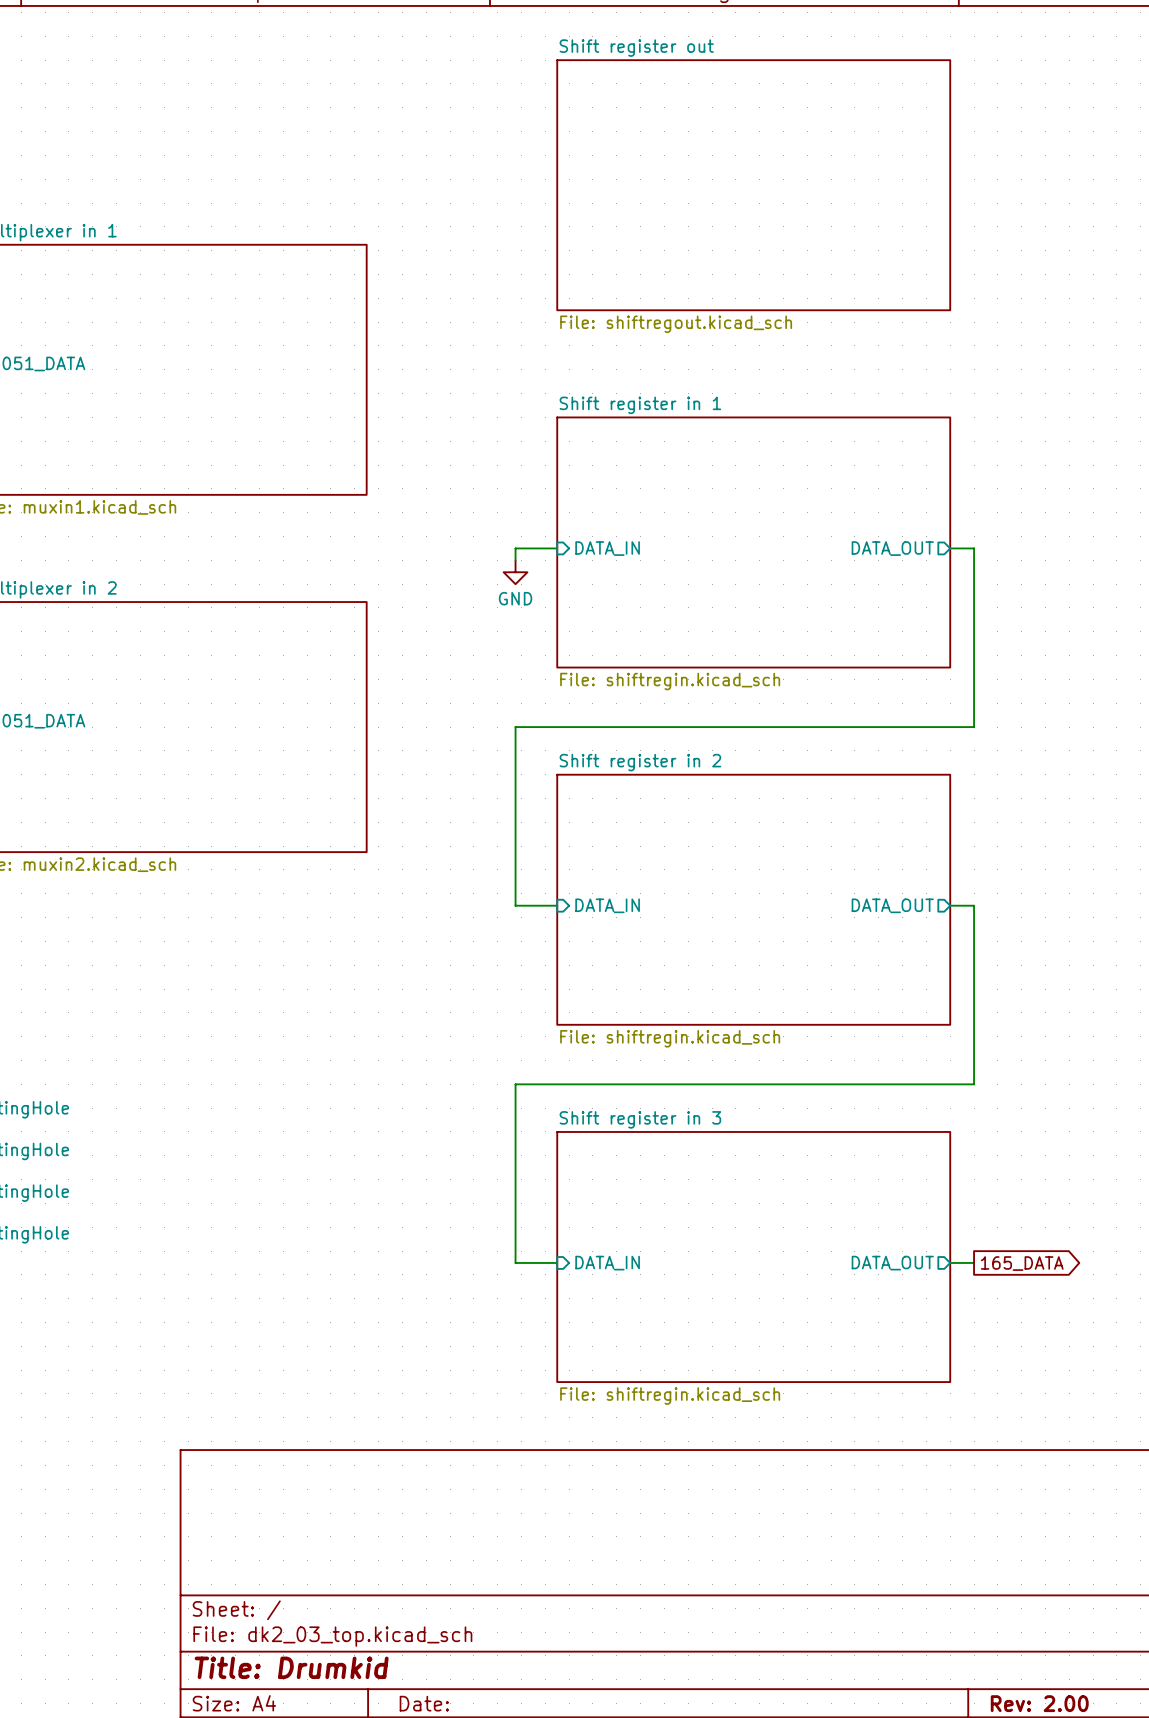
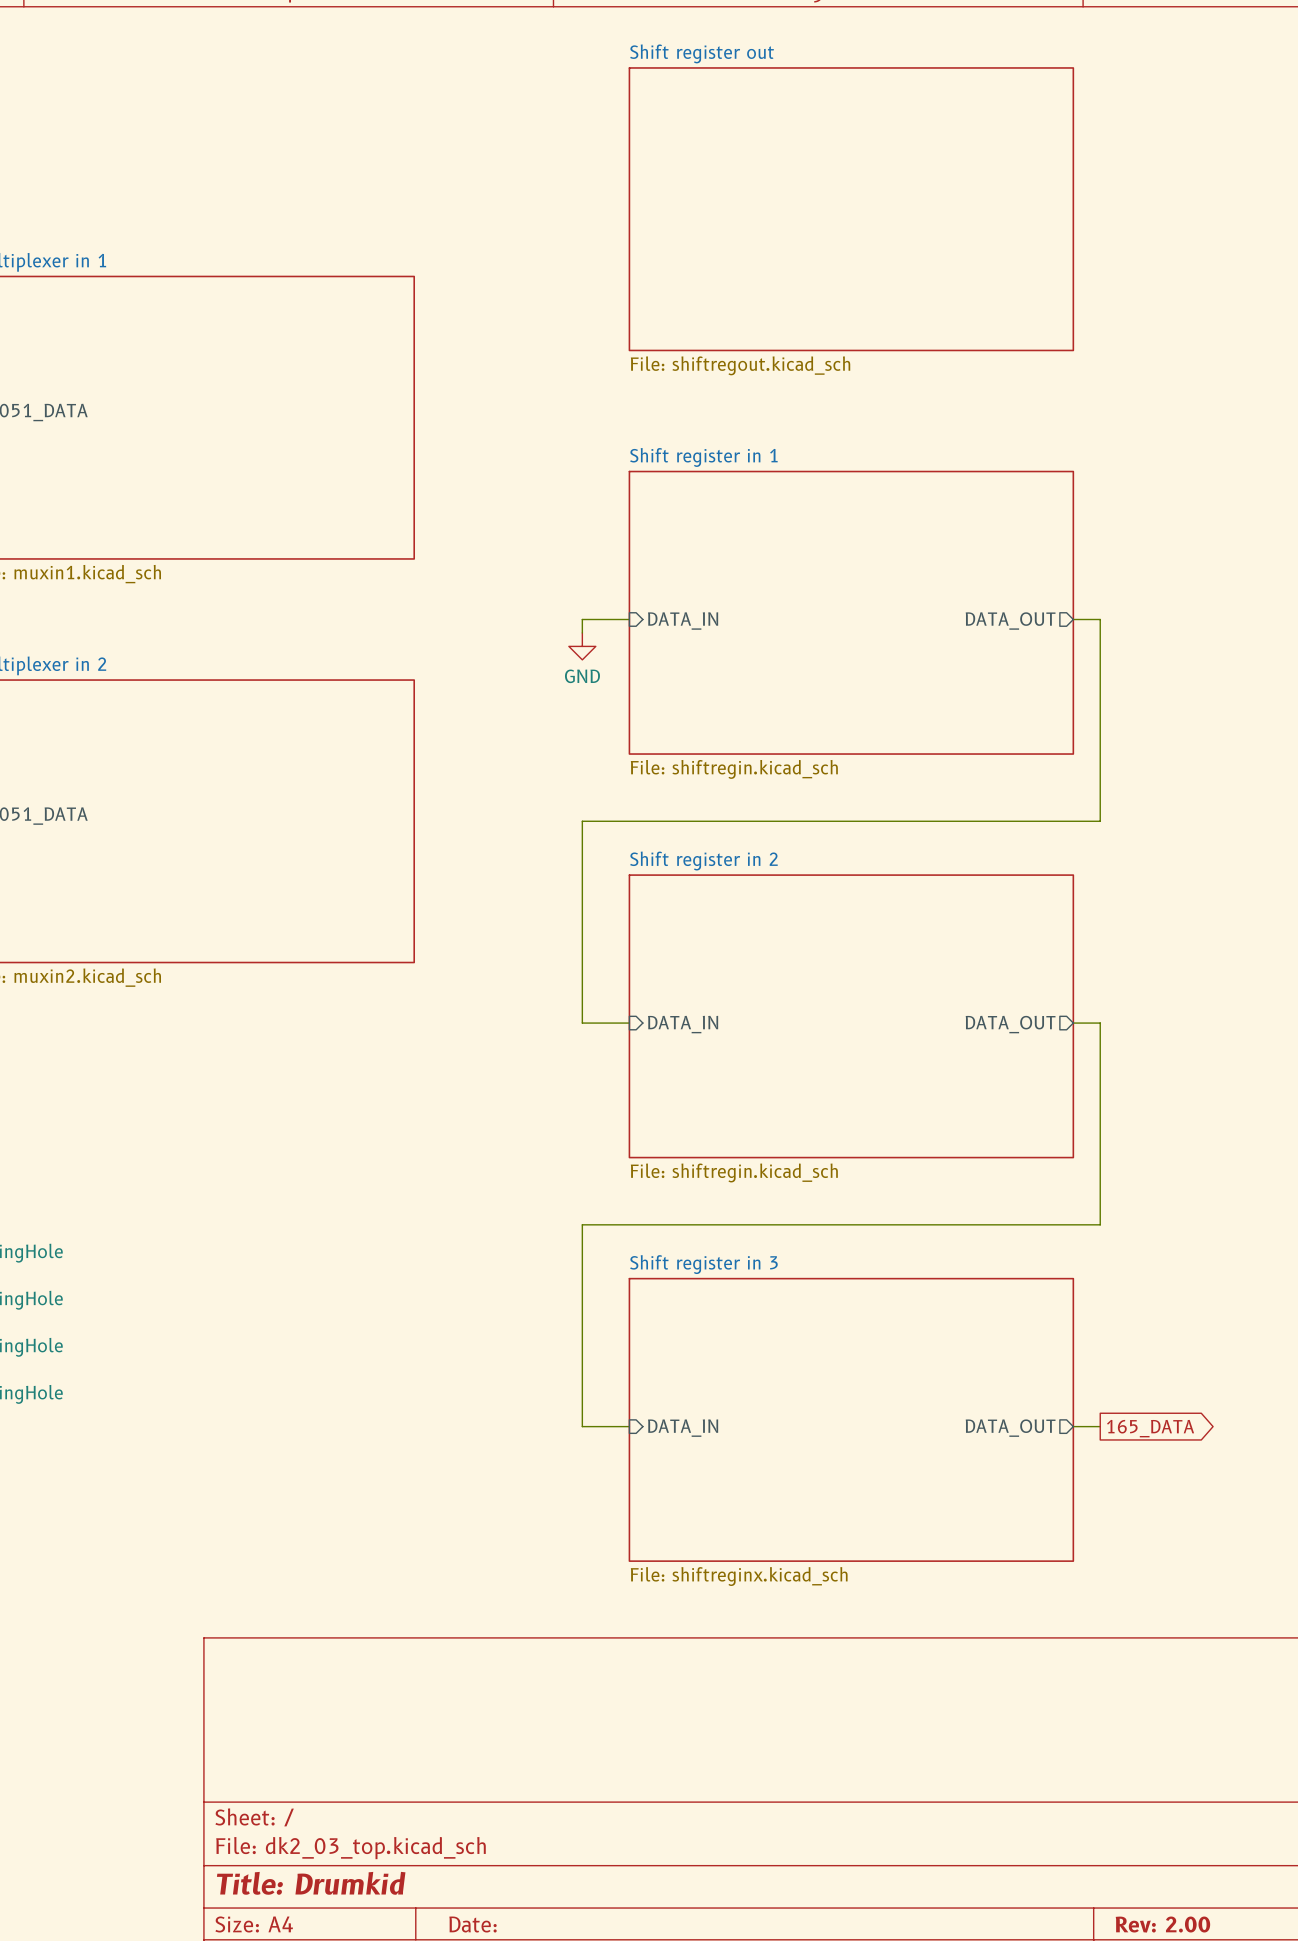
sheet Shift register in 3 value: File: shiftregin.kicad_sch (670, 1396) -> File: shiftreginx.kicad_sch (739, 1576)

